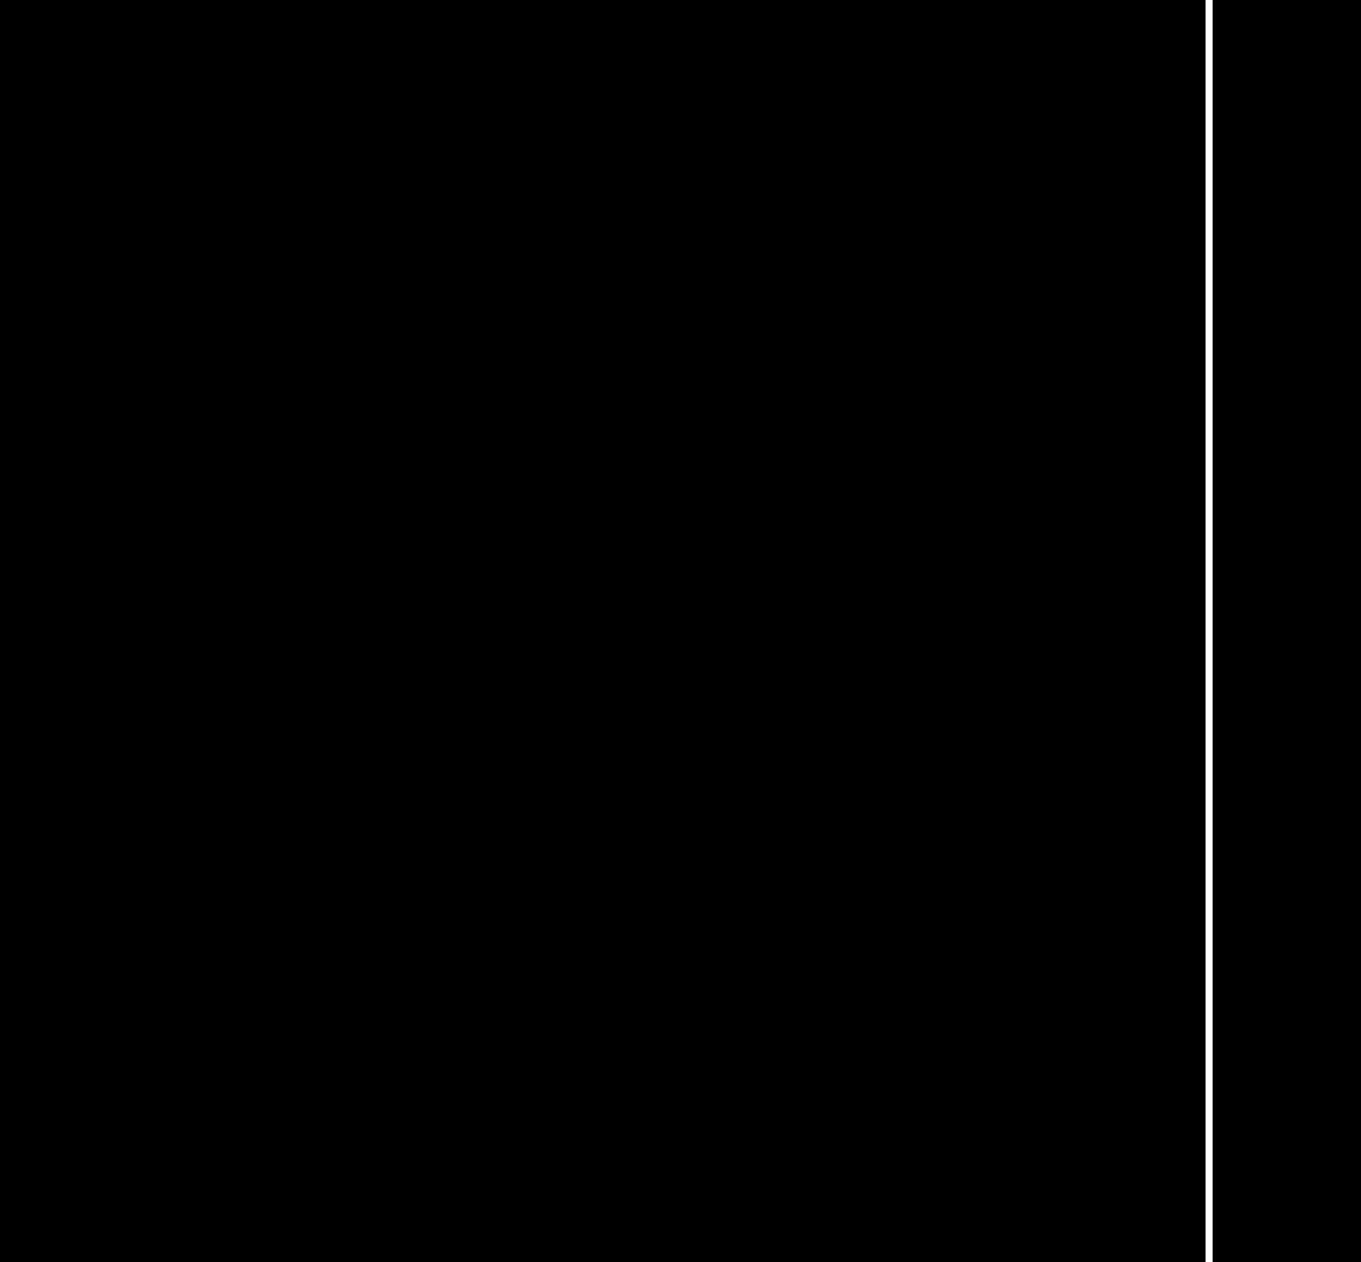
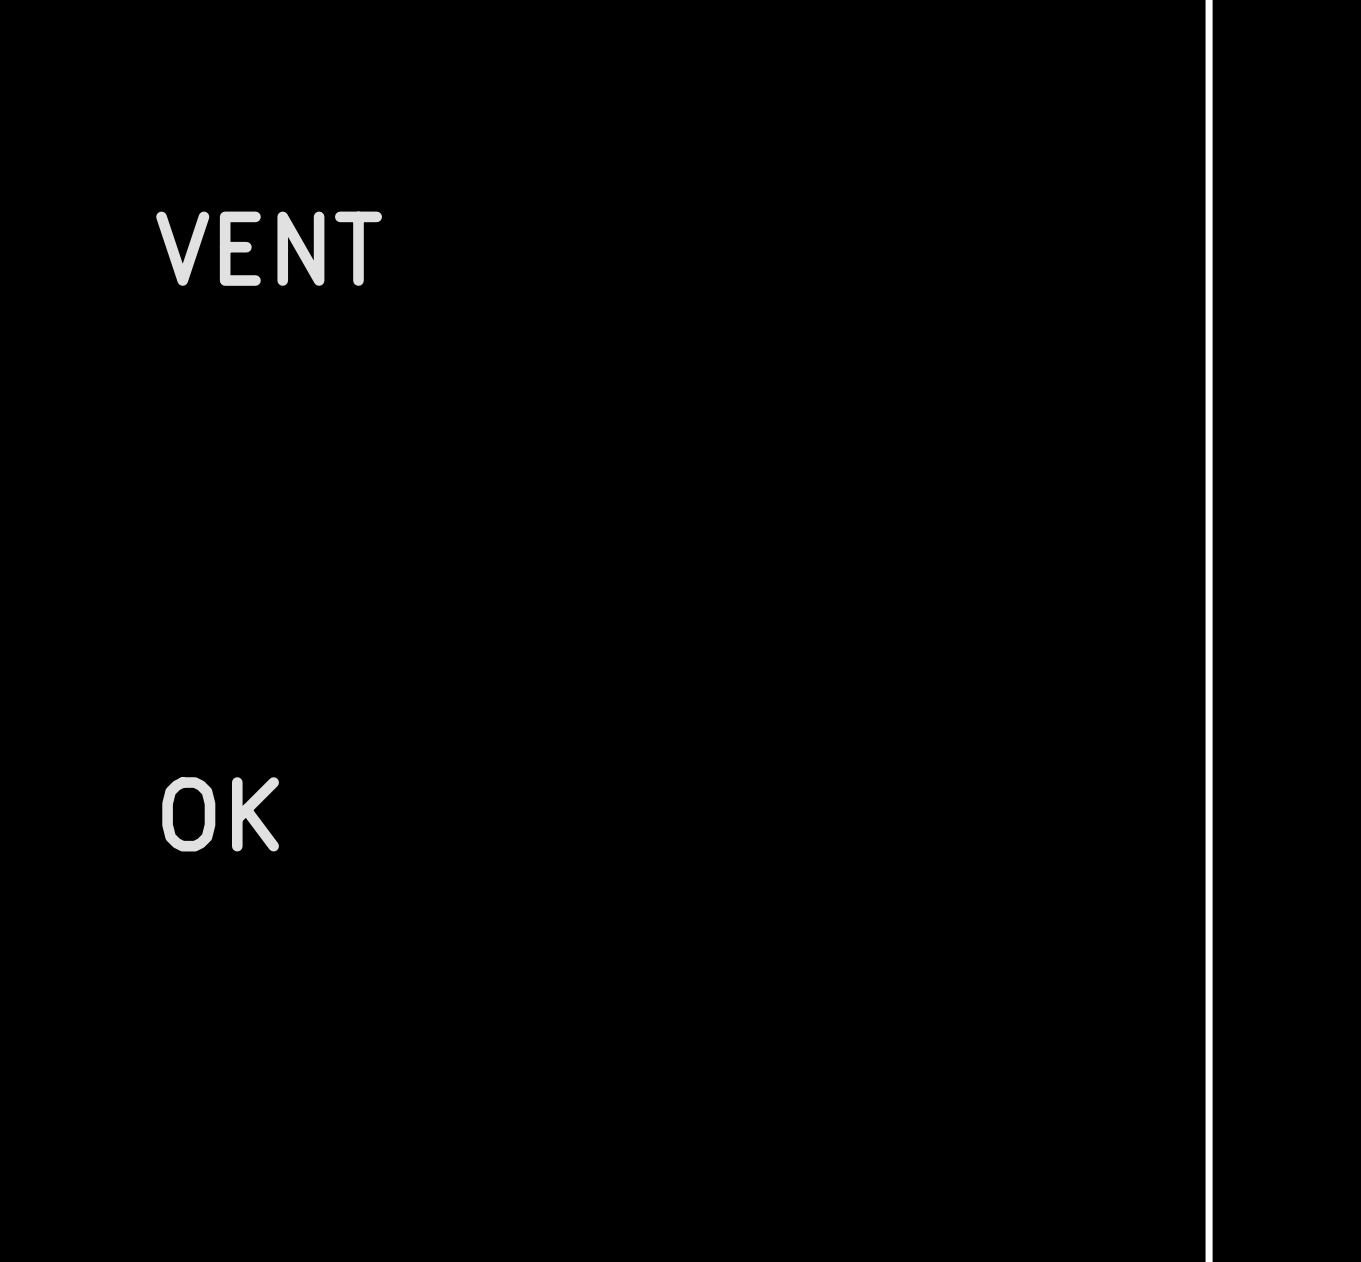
text: none -> VENT (269, 248)
text: none -> OK (220, 814)

